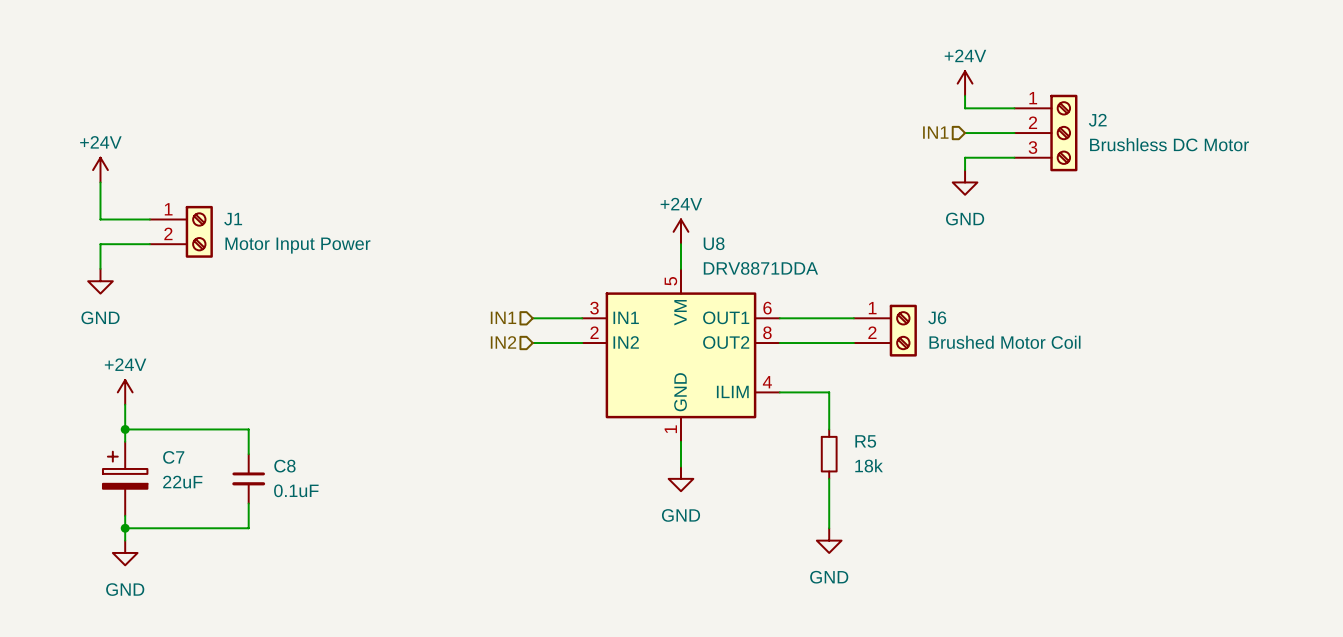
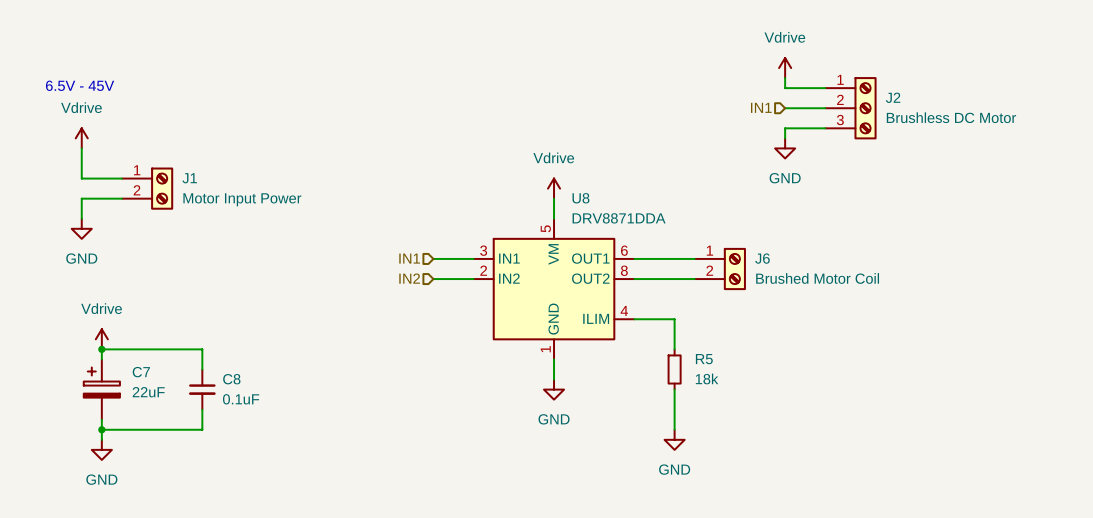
power symbol: +24V (965, 83) -> Vdrive (785, 68)
text: none -> 6.5V - 45V (80, 85)
power symbol: +24V (100, 170) -> Vdrive (81, 138)
power symbol: +24V (680, 231) -> Vdrive (554, 188)
power symbol: +24V (125, 392) -> none
power symbol: none -> Vdrive (101, 339)

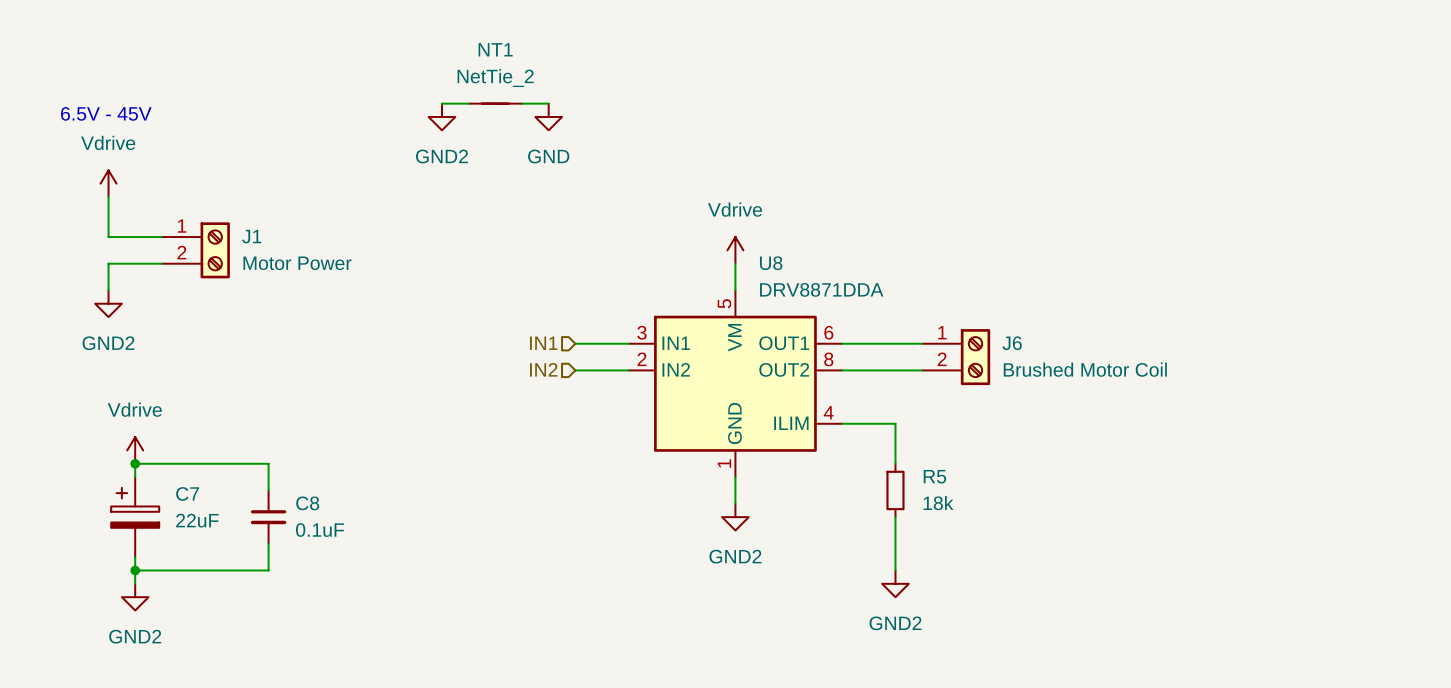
power symbol: Vdrive (785, 68) -> none
wire: none -> (441, 103) (468, 103)
NT1: none -> NetTie_2 (495, 103)
wire: none -> (522, 103) (548, 103)
wire: (785, 78) (785, 88) (825, 88) -> none
power symbol: none -> GND2 (441, 116)
power symbol: none -> GND (548, 116)
hierarchical label: IN1 (761, 107) -> none
wire: (785, 108) (825, 108) -> none
J2: Brushless DC Motor (850, 108) -> none
wire: (825, 128) (785, 128) (785, 138) -> none
power symbol: GND (785, 148) -> none
J1 value: Motor Input Power (242, 199) -> Motor Power (297, 263)
power symbol: GND (81, 228) -> GND2 (108, 303)
power symbol: GND (554, 389) -> GND2 (735, 517)
power symbol: GND (674, 439) -> GND2 (895, 583)
power symbol: GND (101, 449) -> GND2 (135, 597)

